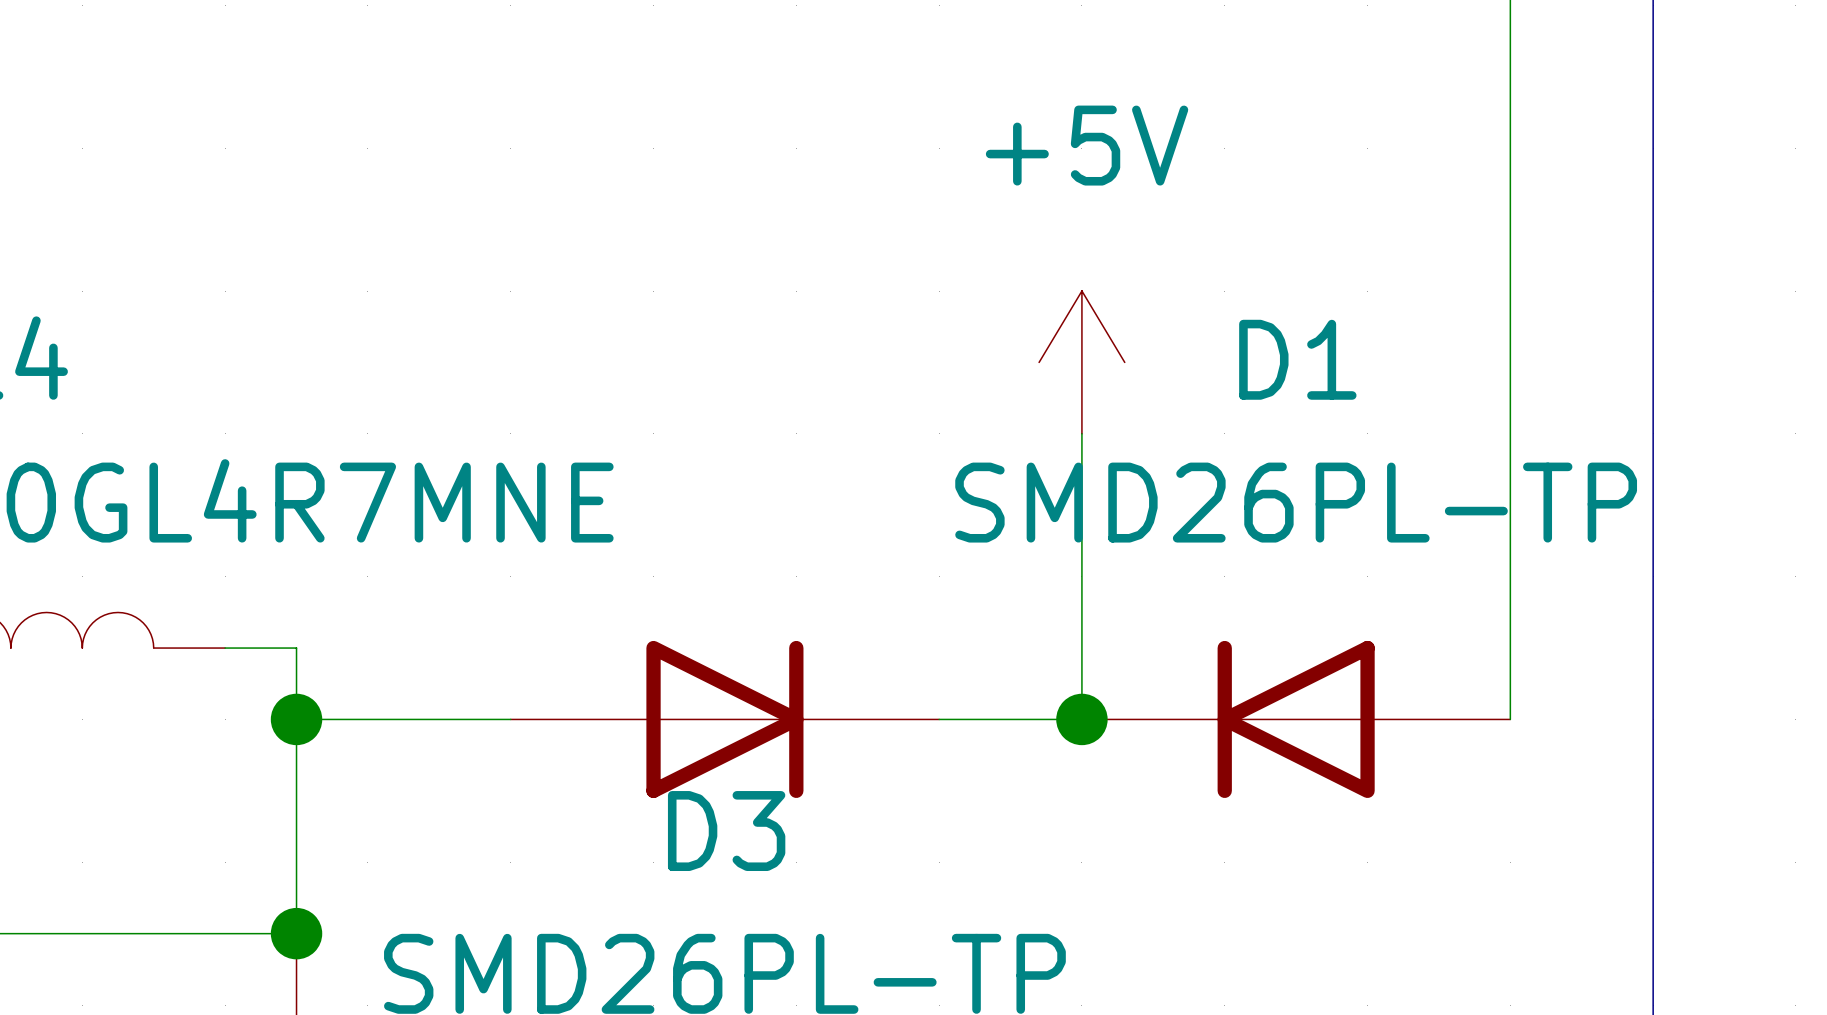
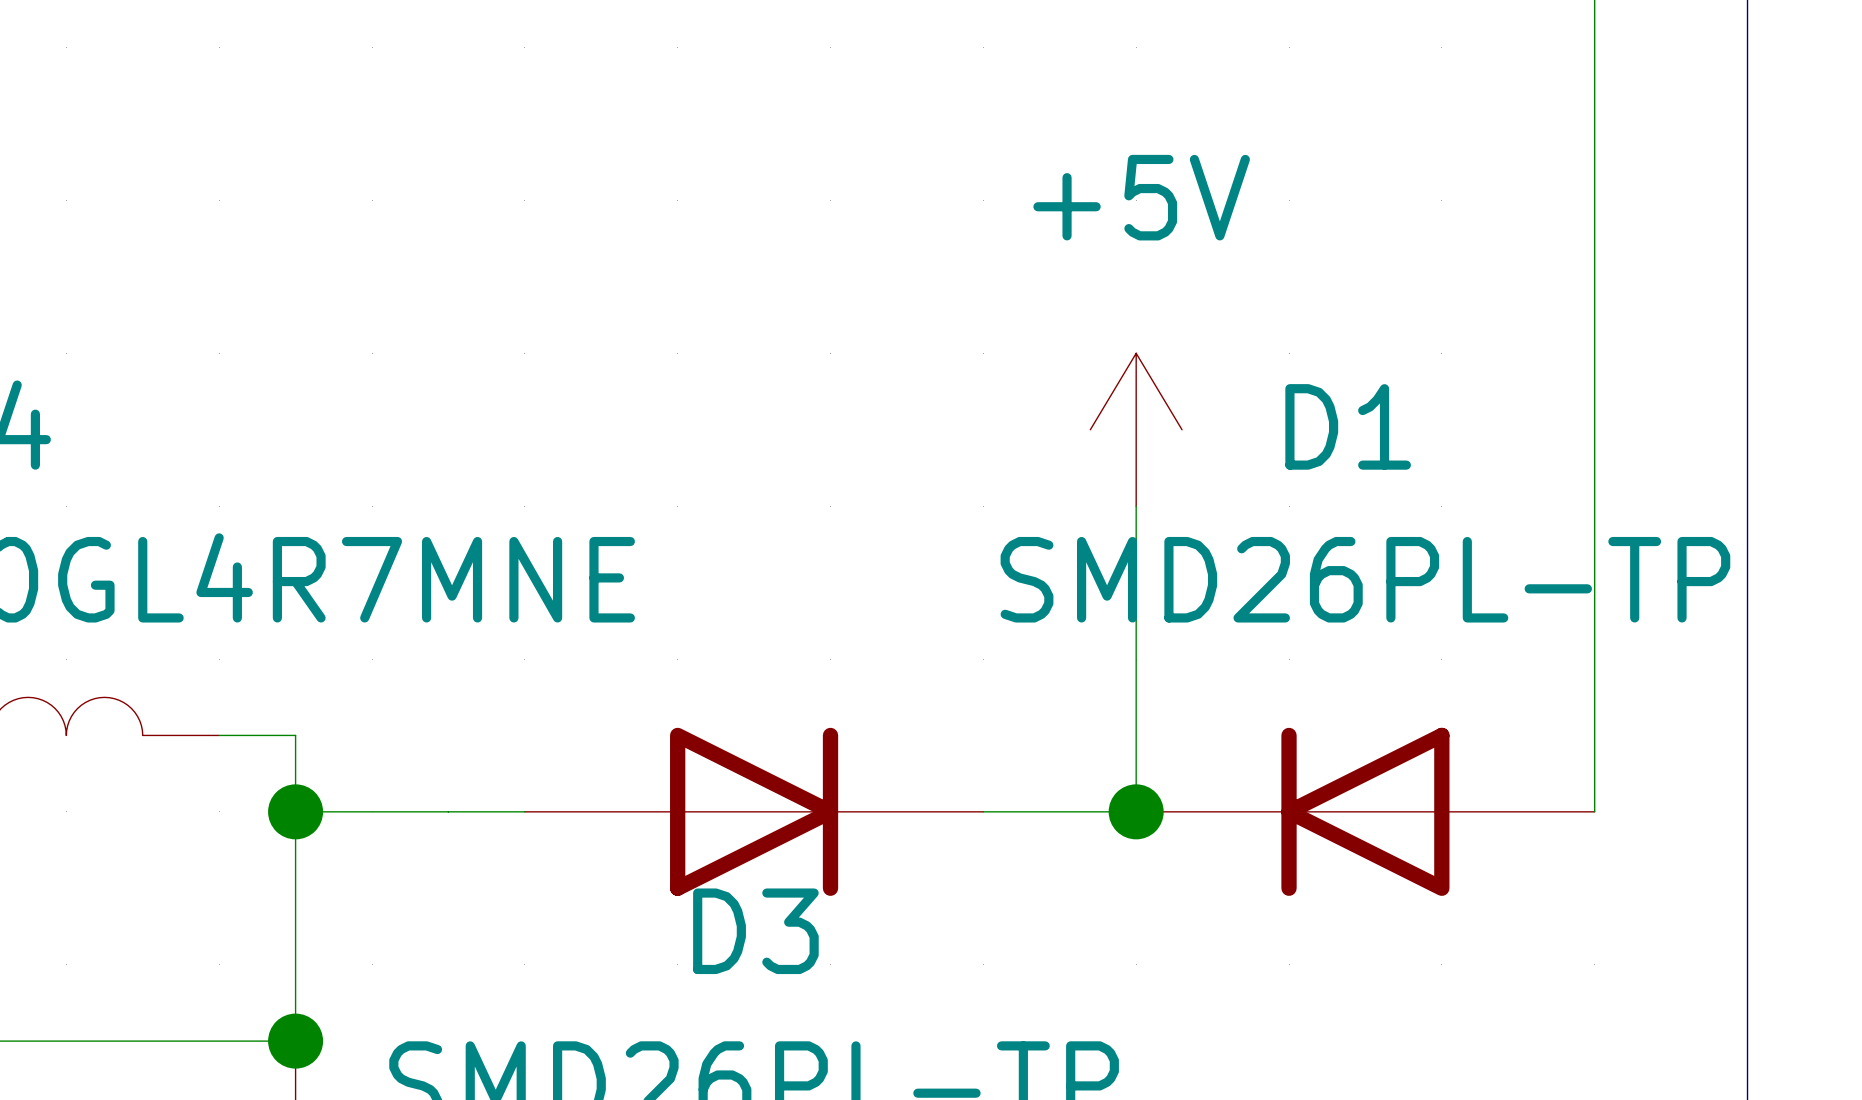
D1 name position: D1 (1297, 359) -> D1 (1348, 426)

